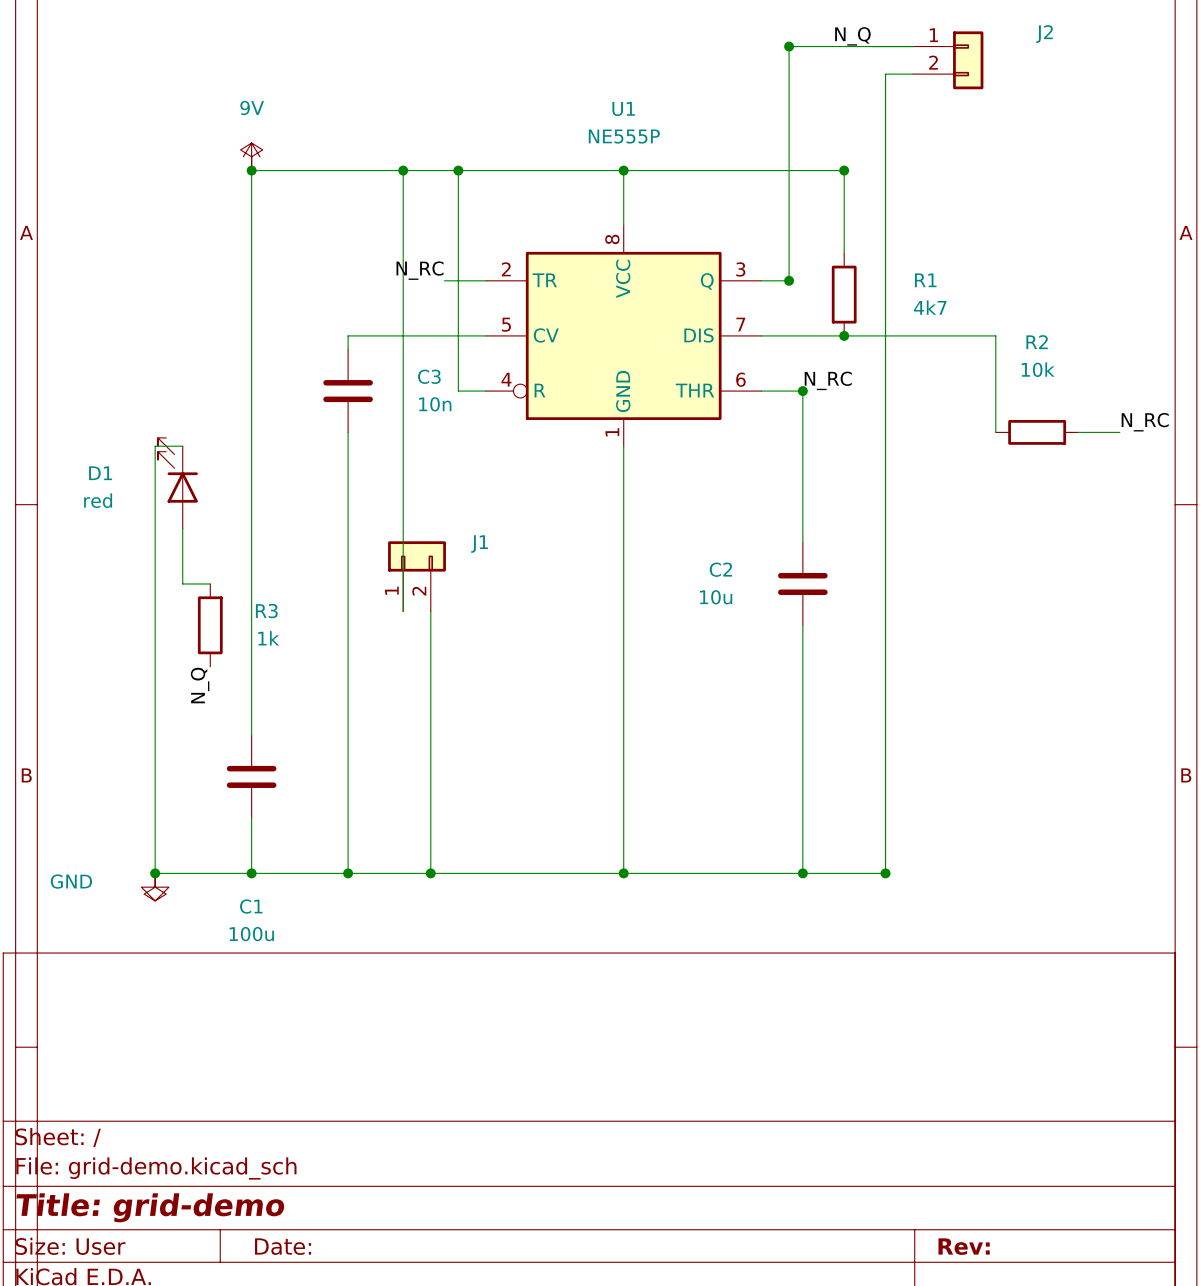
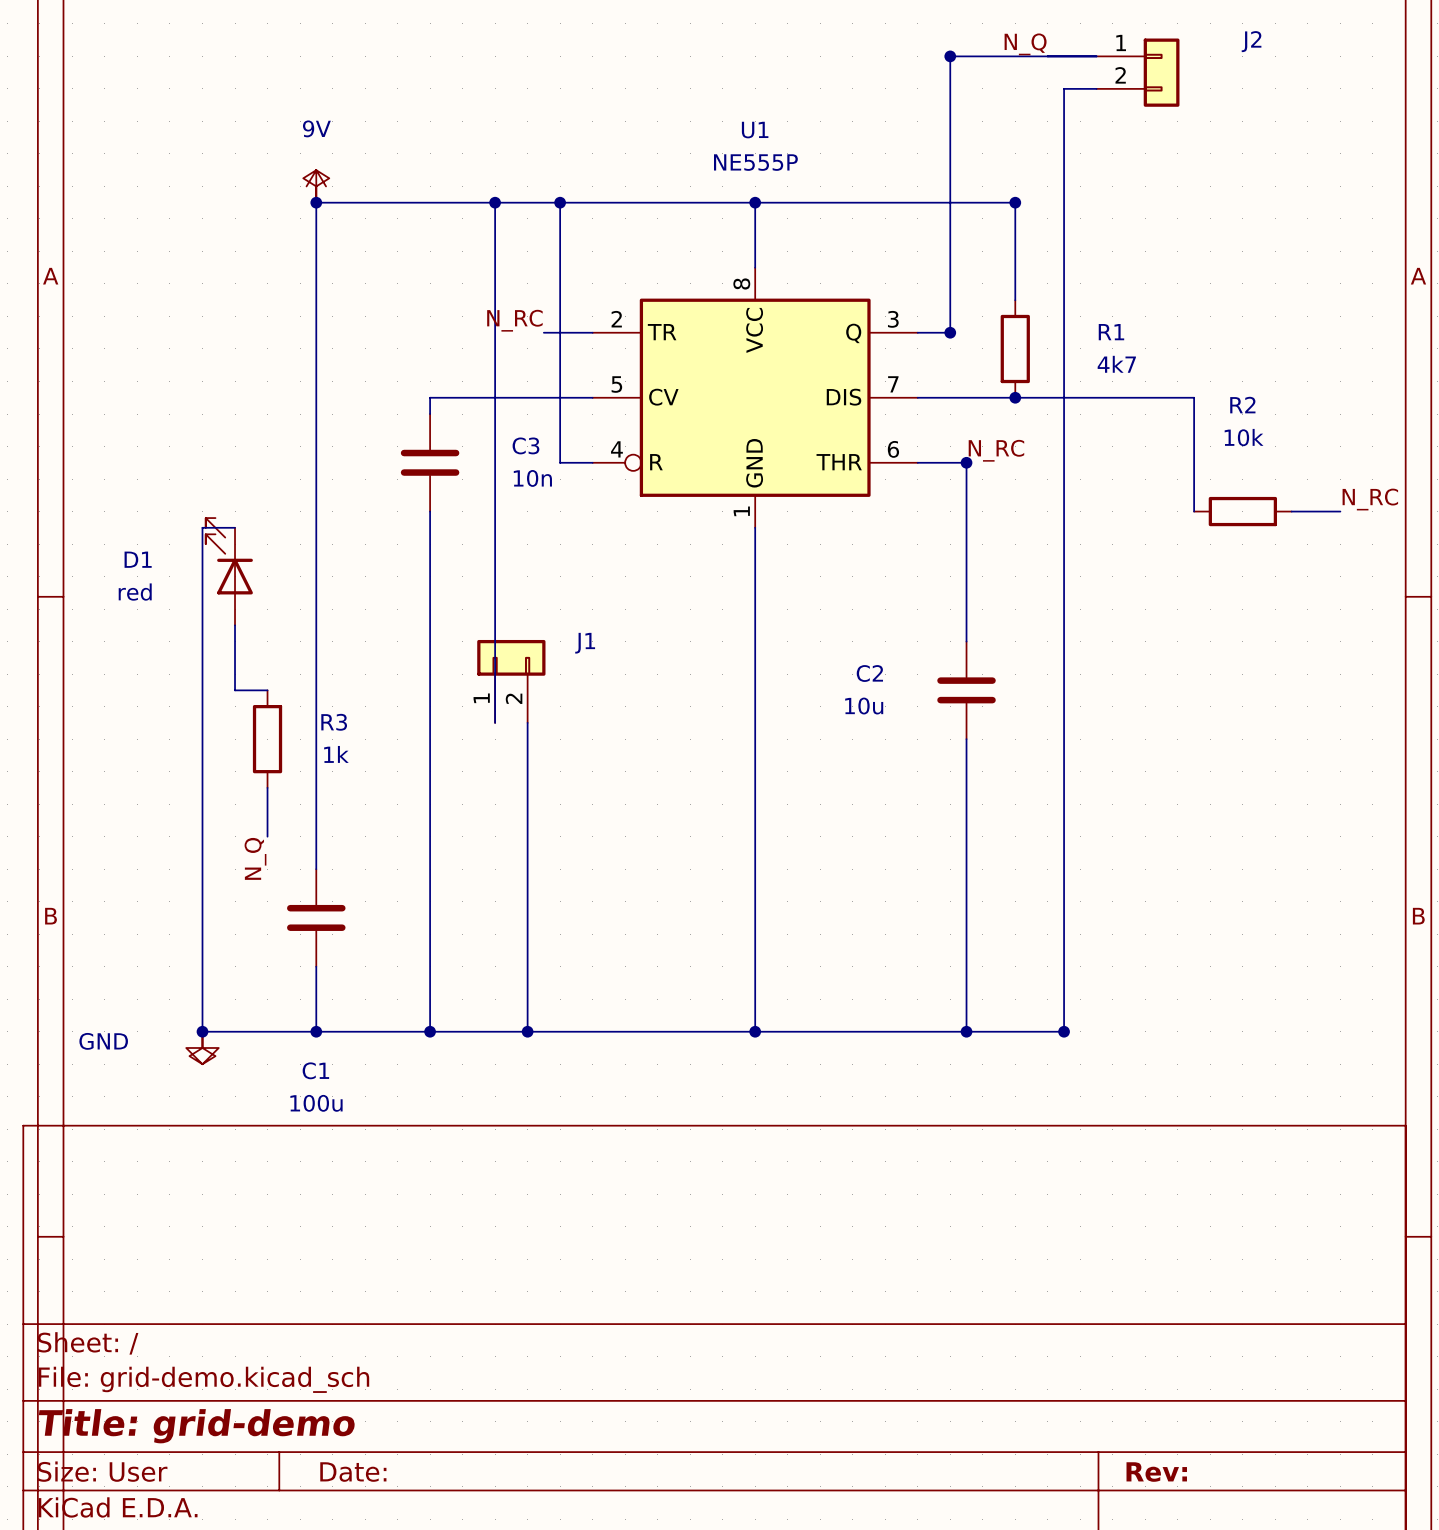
wire: none -> (267, 787) (267, 836)
label position: N_Q (200, 685) -> N_Q (255, 858)

